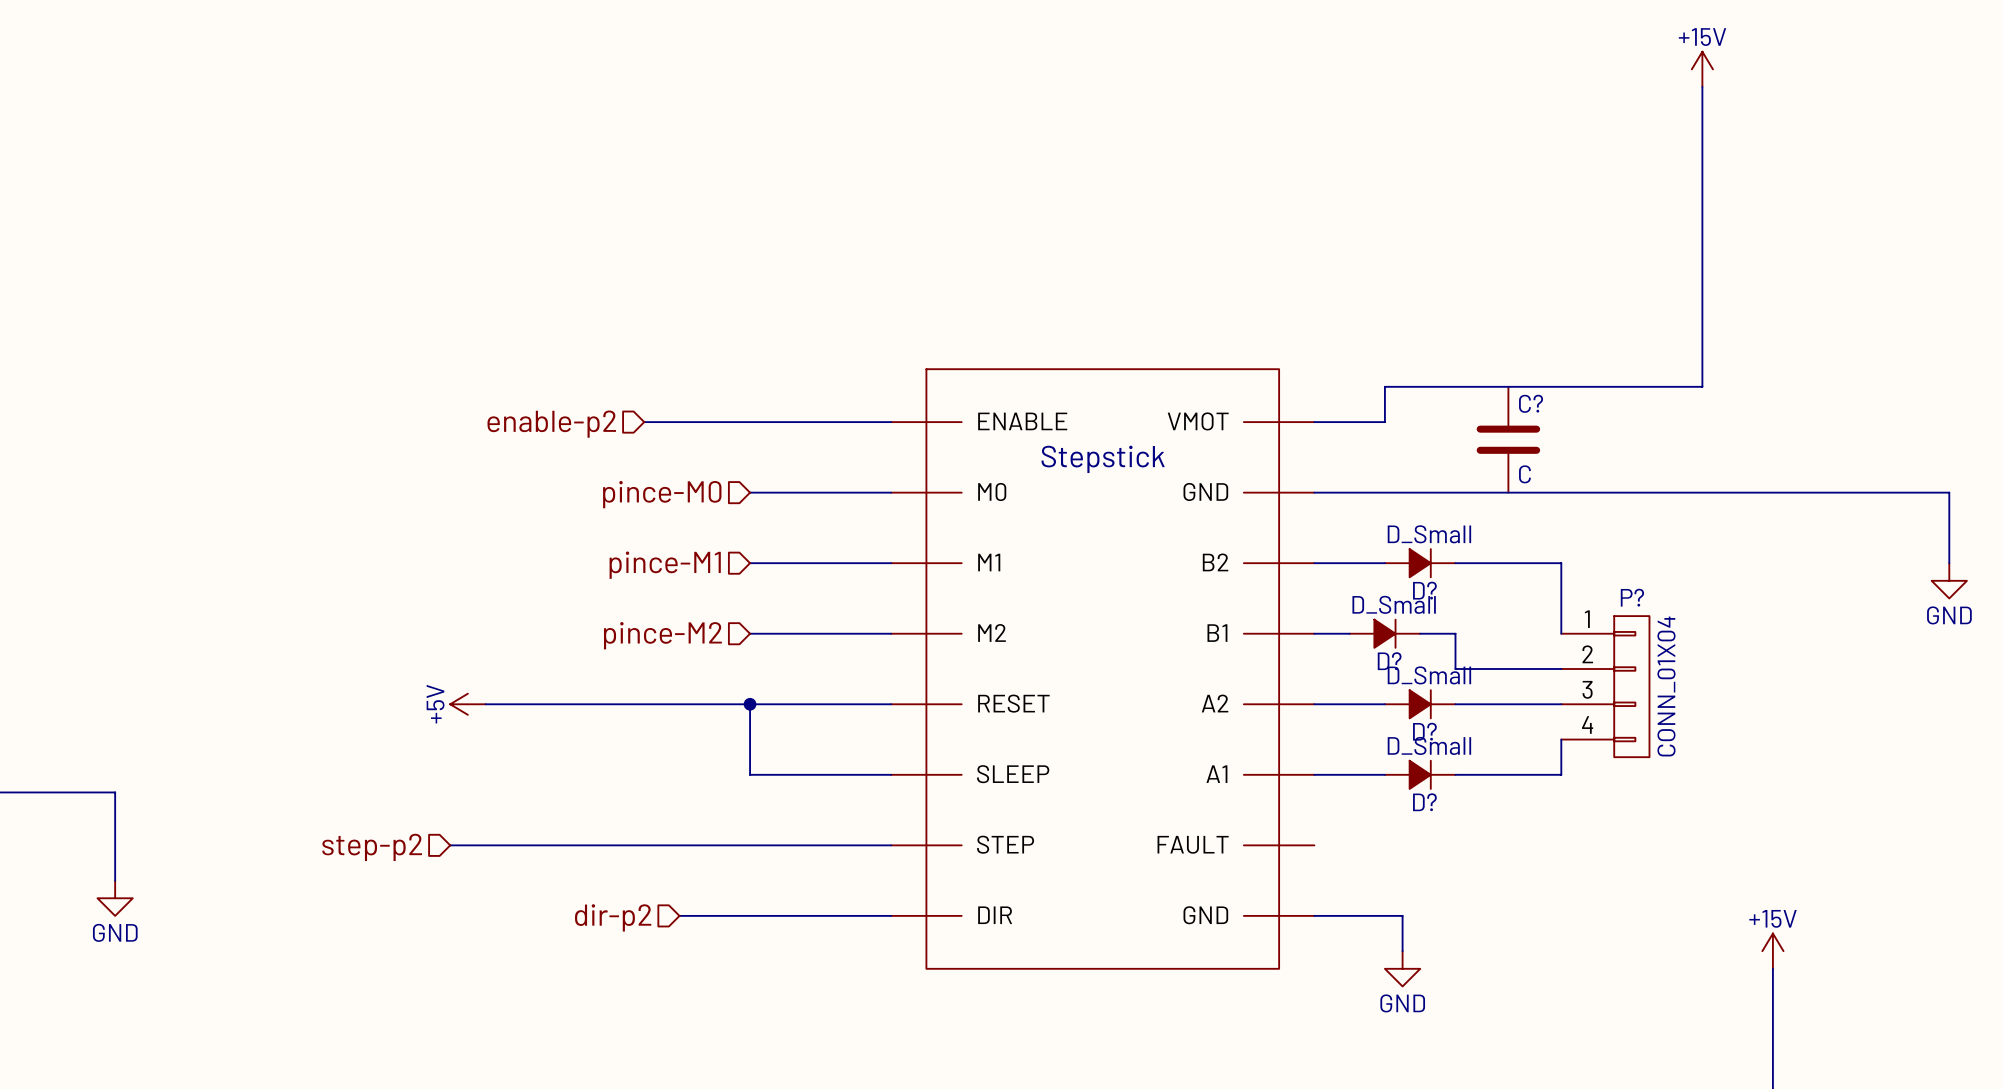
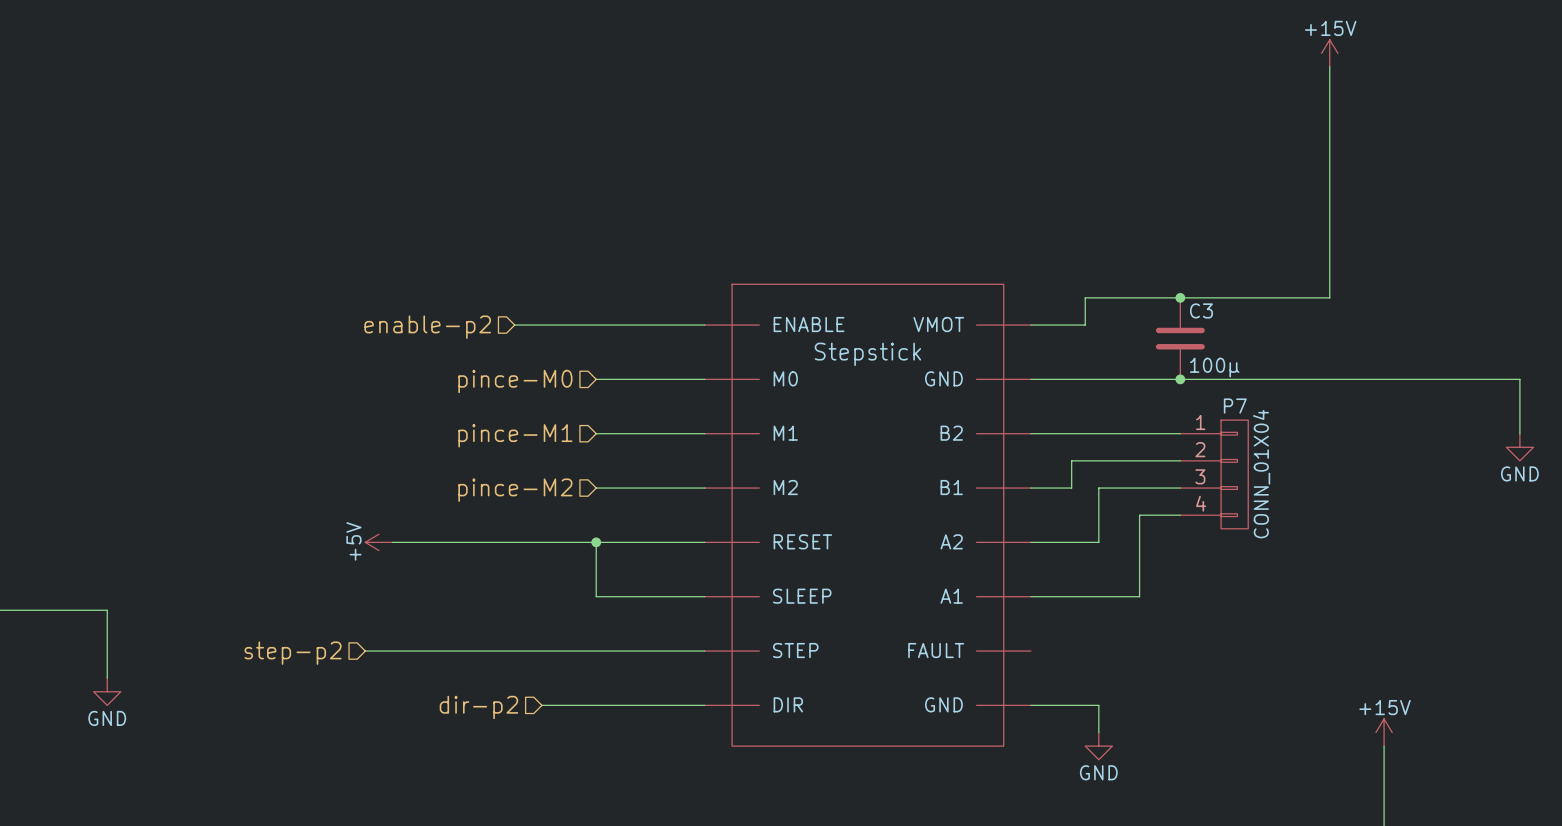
junction: none -> (1180, 297)
C? name: C? (1531, 403) -> C3 (1201, 310)
C? value: C (1524, 474) -> 100µ (1214, 367)
junction: none -> (1180, 379)
D?: D_Small (1420, 563) -> none
wire: none -> (1180, 460) (1071, 460) (1071, 488) (1058, 488)
P7: none -> CONN_01X04 (1214, 474)
D?: D_Small (1384, 633) -> none
wire: none -> (1112, 488) (1098, 488) (1098, 542) (1085, 542)
wire: (1455, 633) (1455, 669) -> (1139, 488) (1180, 488)
wire: none -> (1139, 515) (1139, 596) (1085, 596)
P?: CONN_01X04 (1605, 686) -> none
D?: D_Small (1420, 704) -> none
wire: (1455, 704) (1561, 704) -> none
wire: (1561, 739) (1561, 774) (1455, 774) -> none
D?: D_Small (1420, 774) -> none

